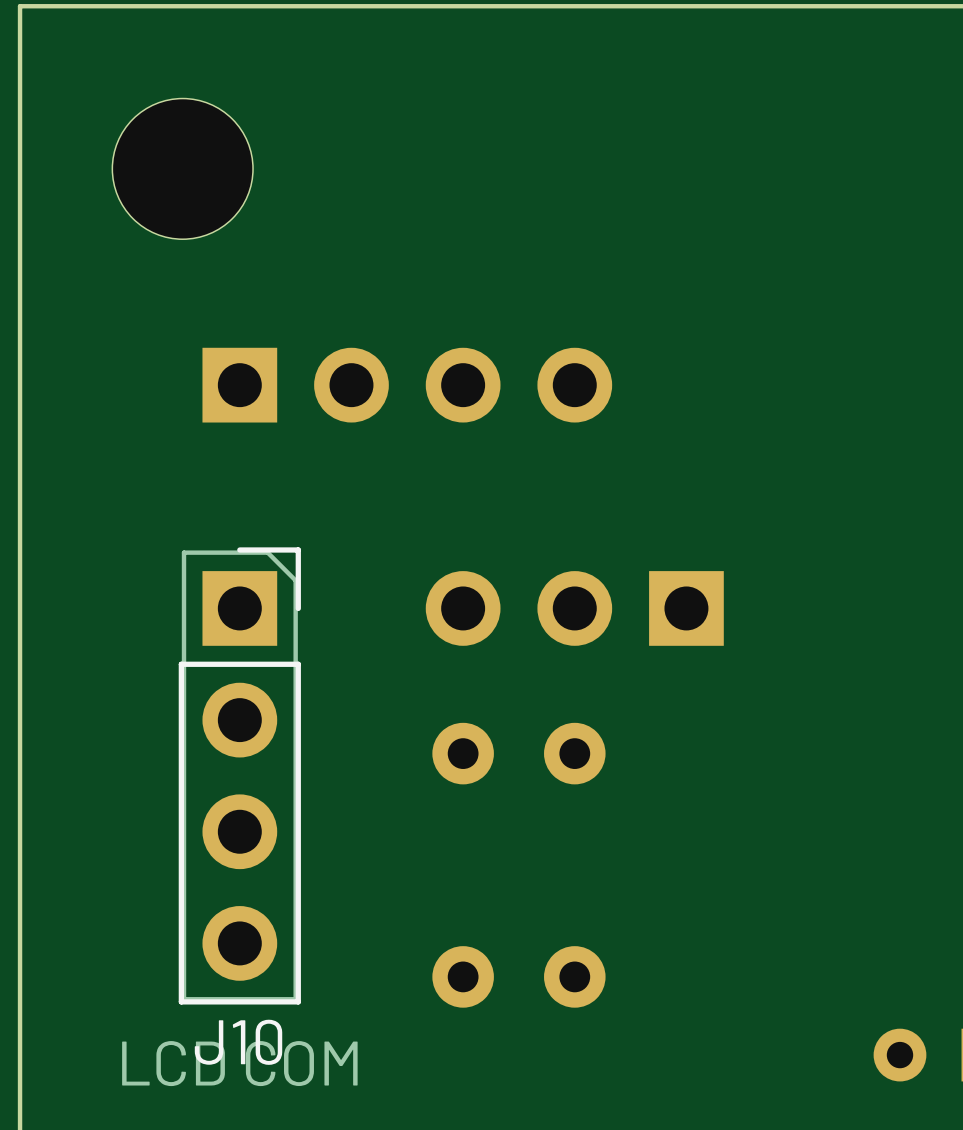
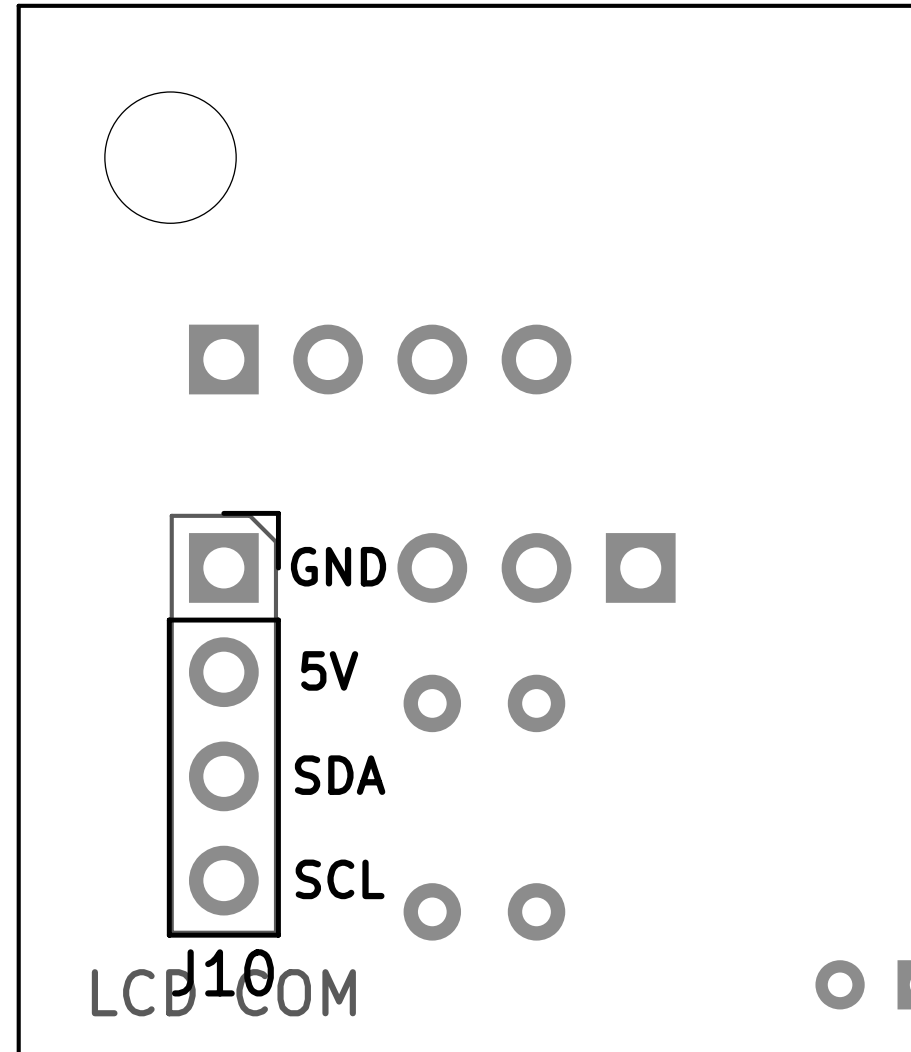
text: none -> GND (338, 566)
text: none -> 5V (329, 670)
text: none -> SDA (340, 775)
text: none -> SCL (340, 879)

